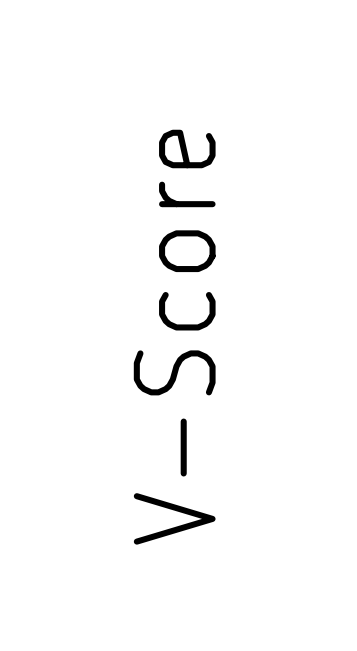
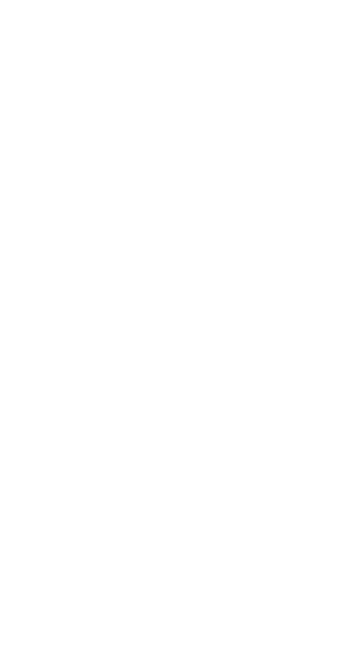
text: V-Score (174, 337) -> none

